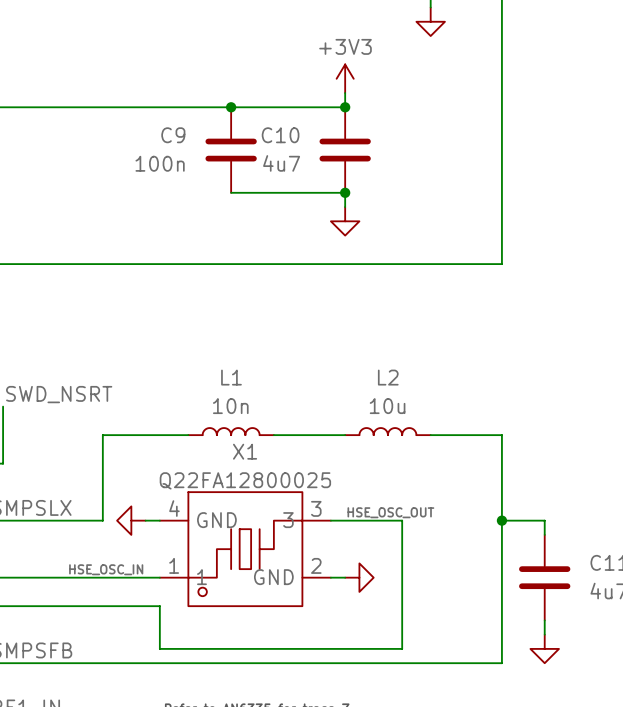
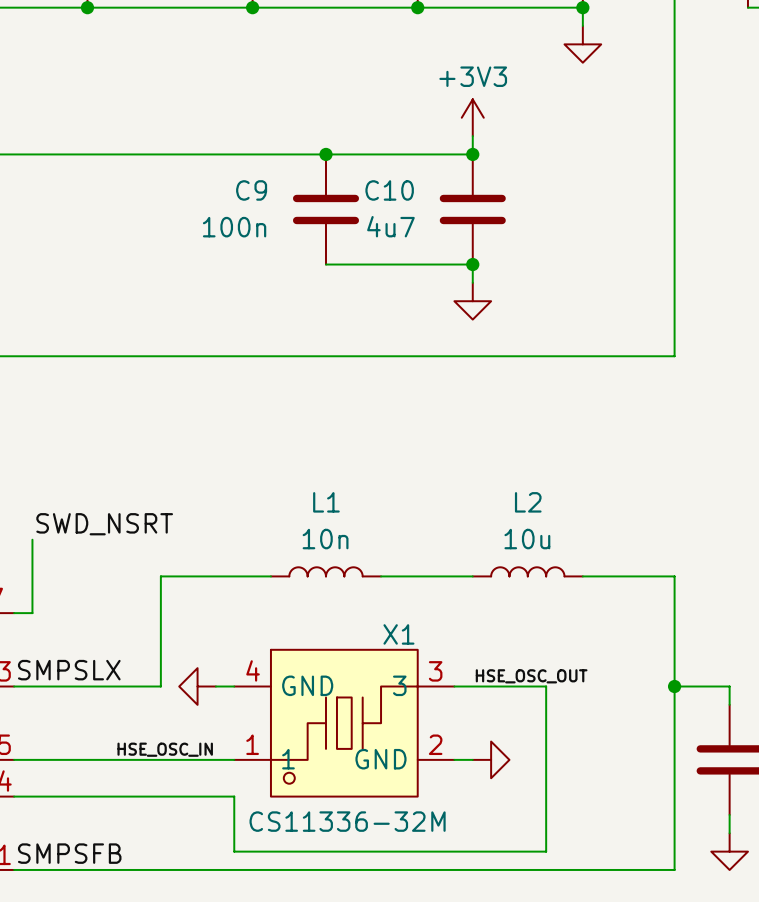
X1 name position: X1 (245, 451) -> X1 (398, 634)
X1 value: Q22FA12800025 (245, 480) -> CS11336-32M (347, 821)

